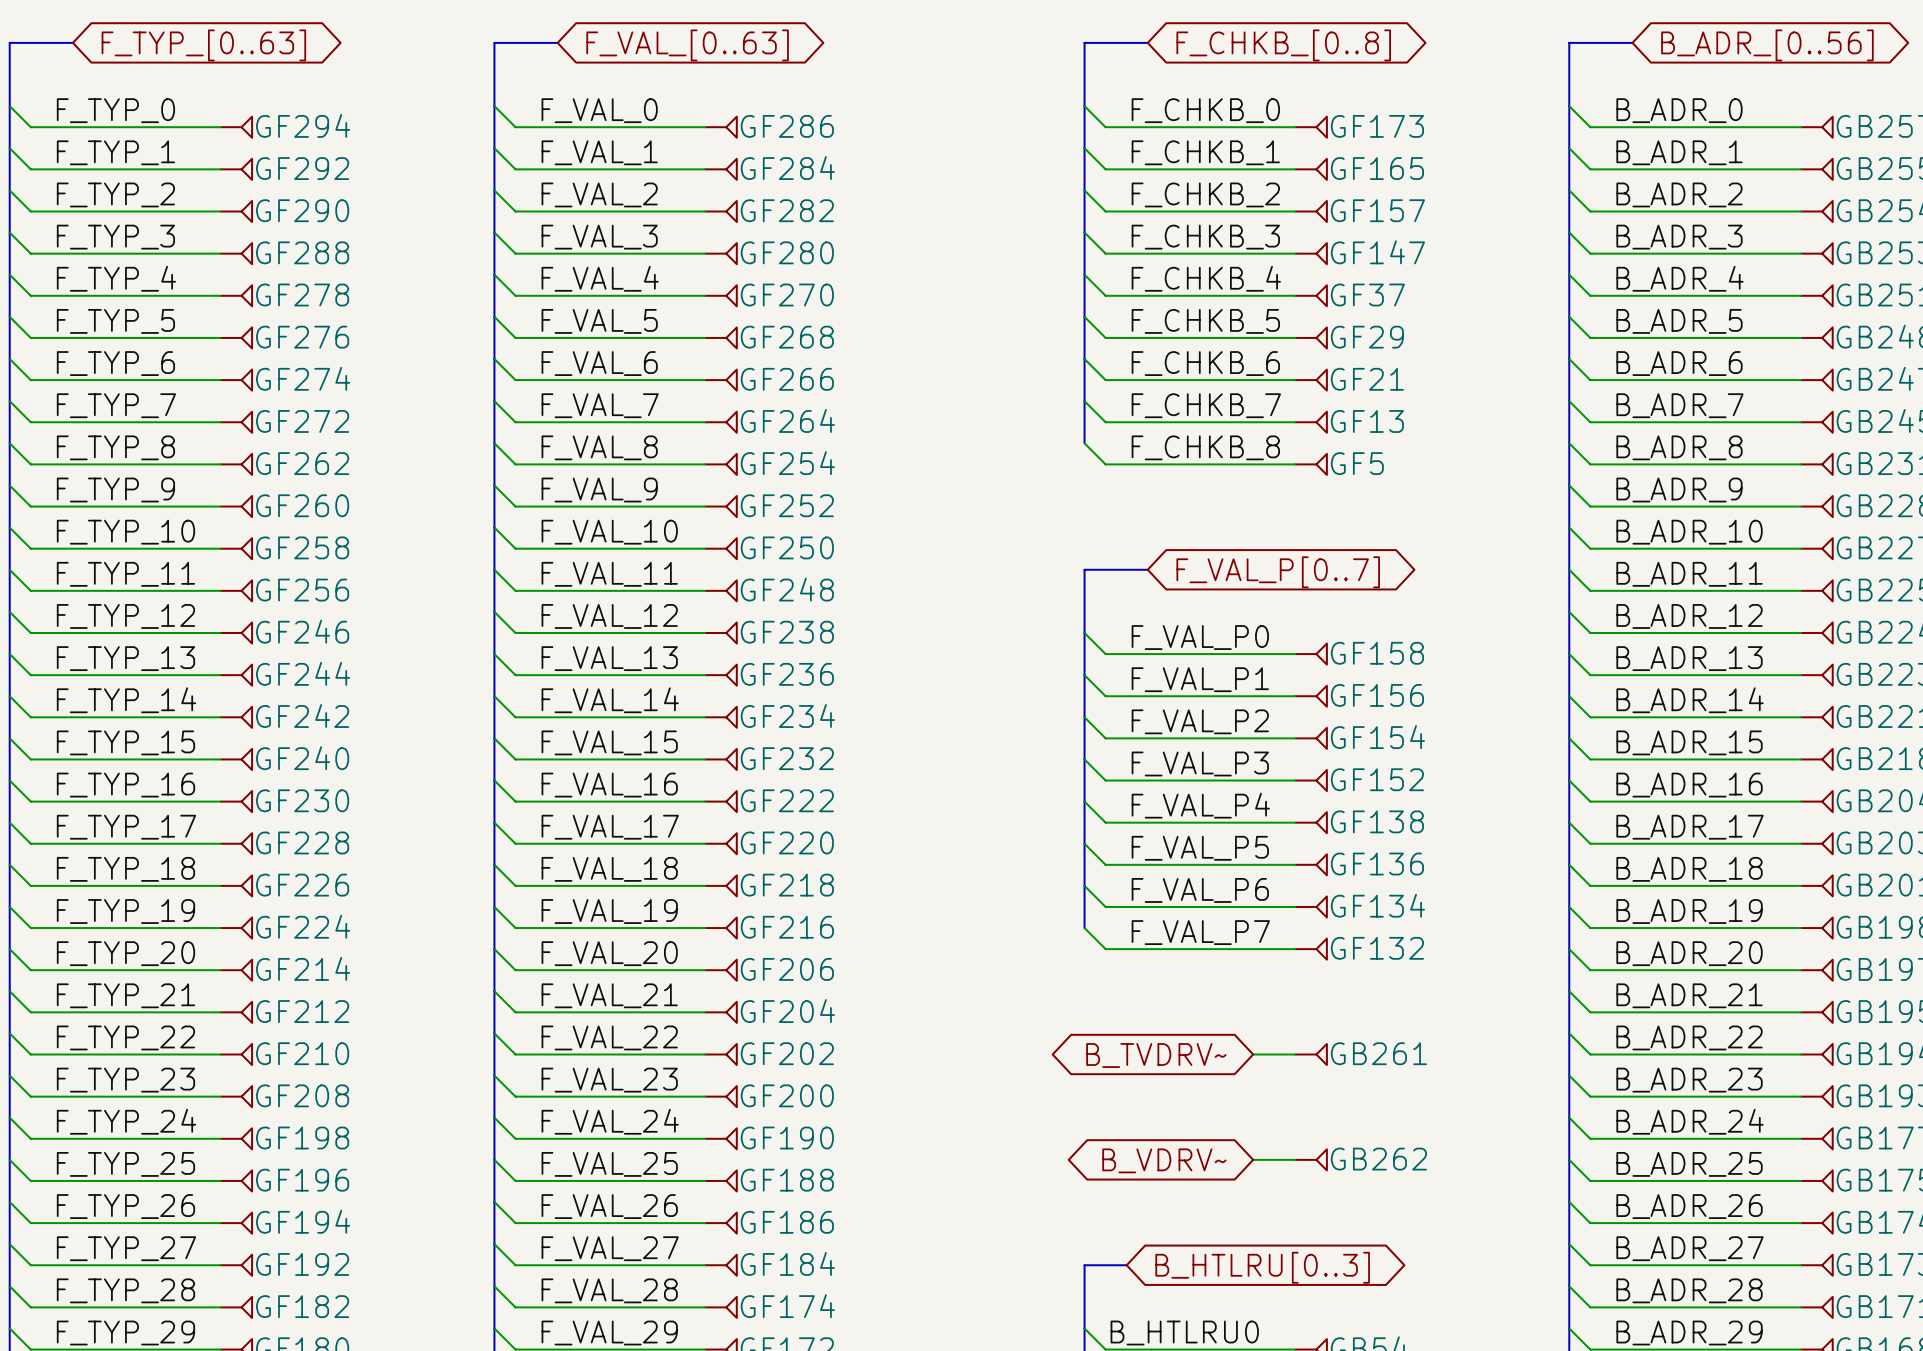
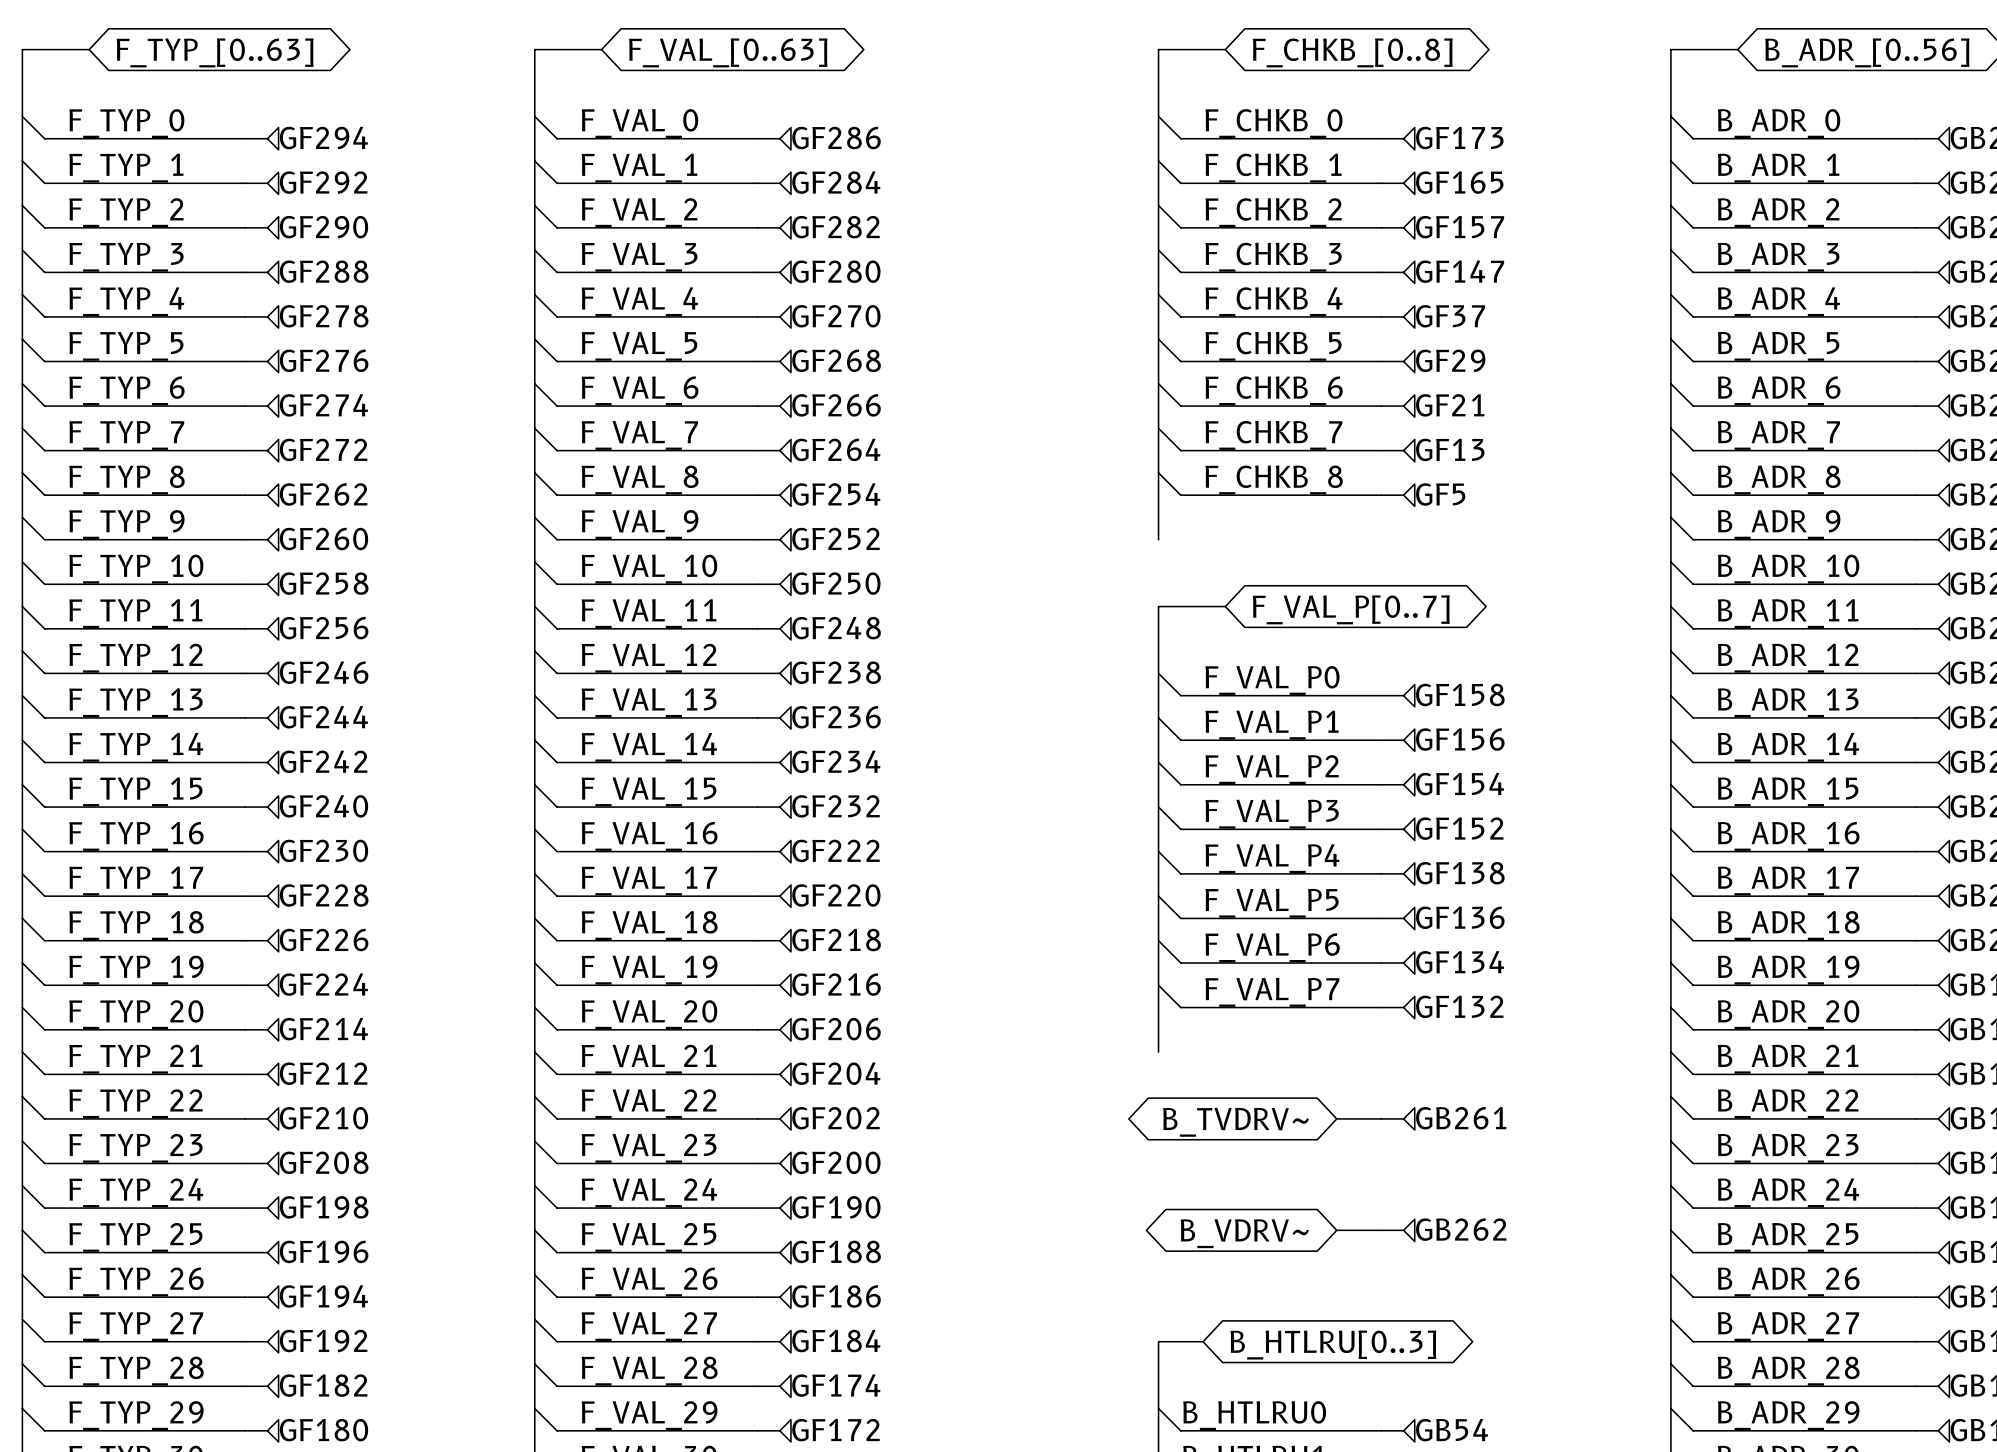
bus: none -> (1158, 472) (1158, 539)
bus: none -> (1158, 985) (1158, 1052)

